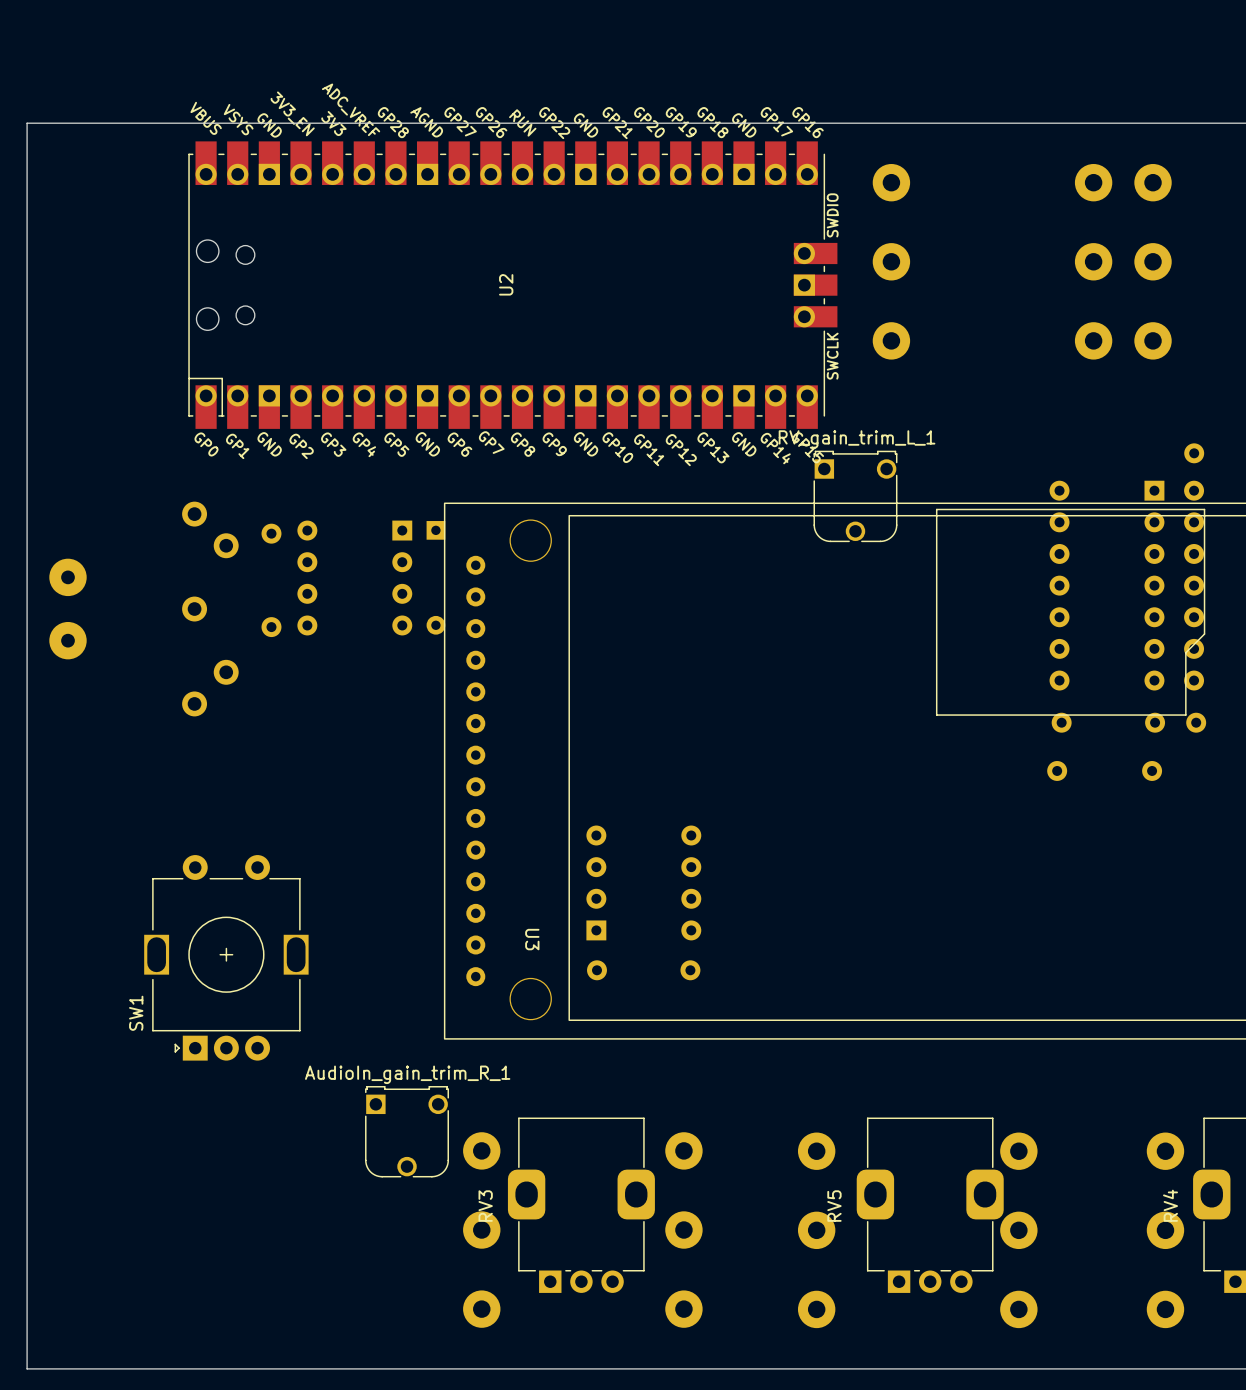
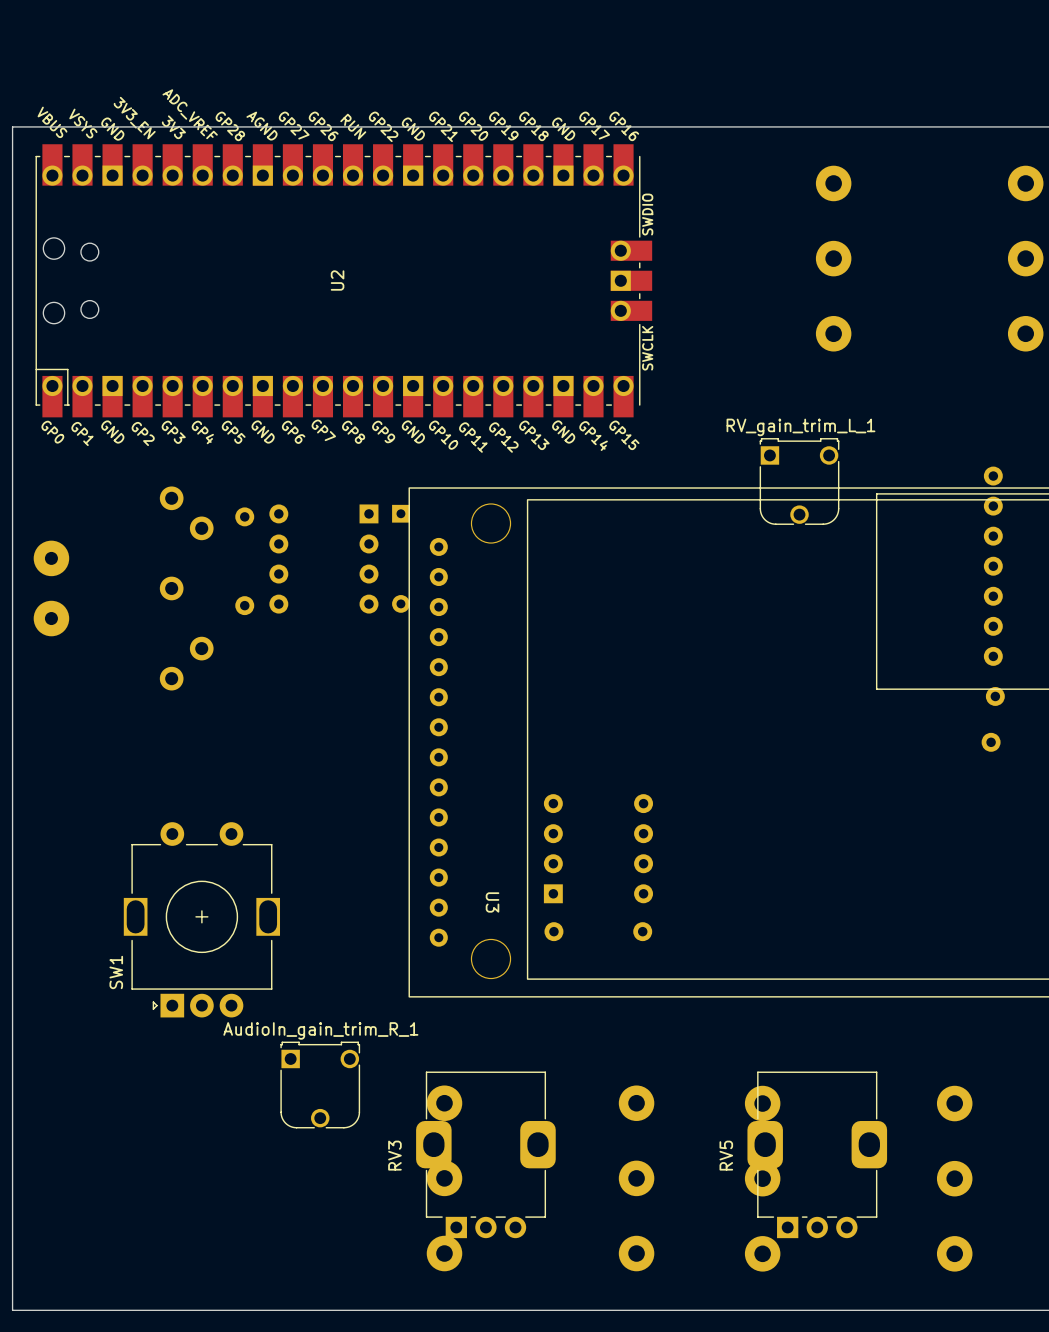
U2 position: (512, 285) -> (343, 280)
AudioIn_gain_trim_R_1 position: (407, 1131) -> (320, 1085)
RV3 position: (581, 1205) -> (485, 1154)
RV5 position: (930, 1205) -> (817, 1154)

